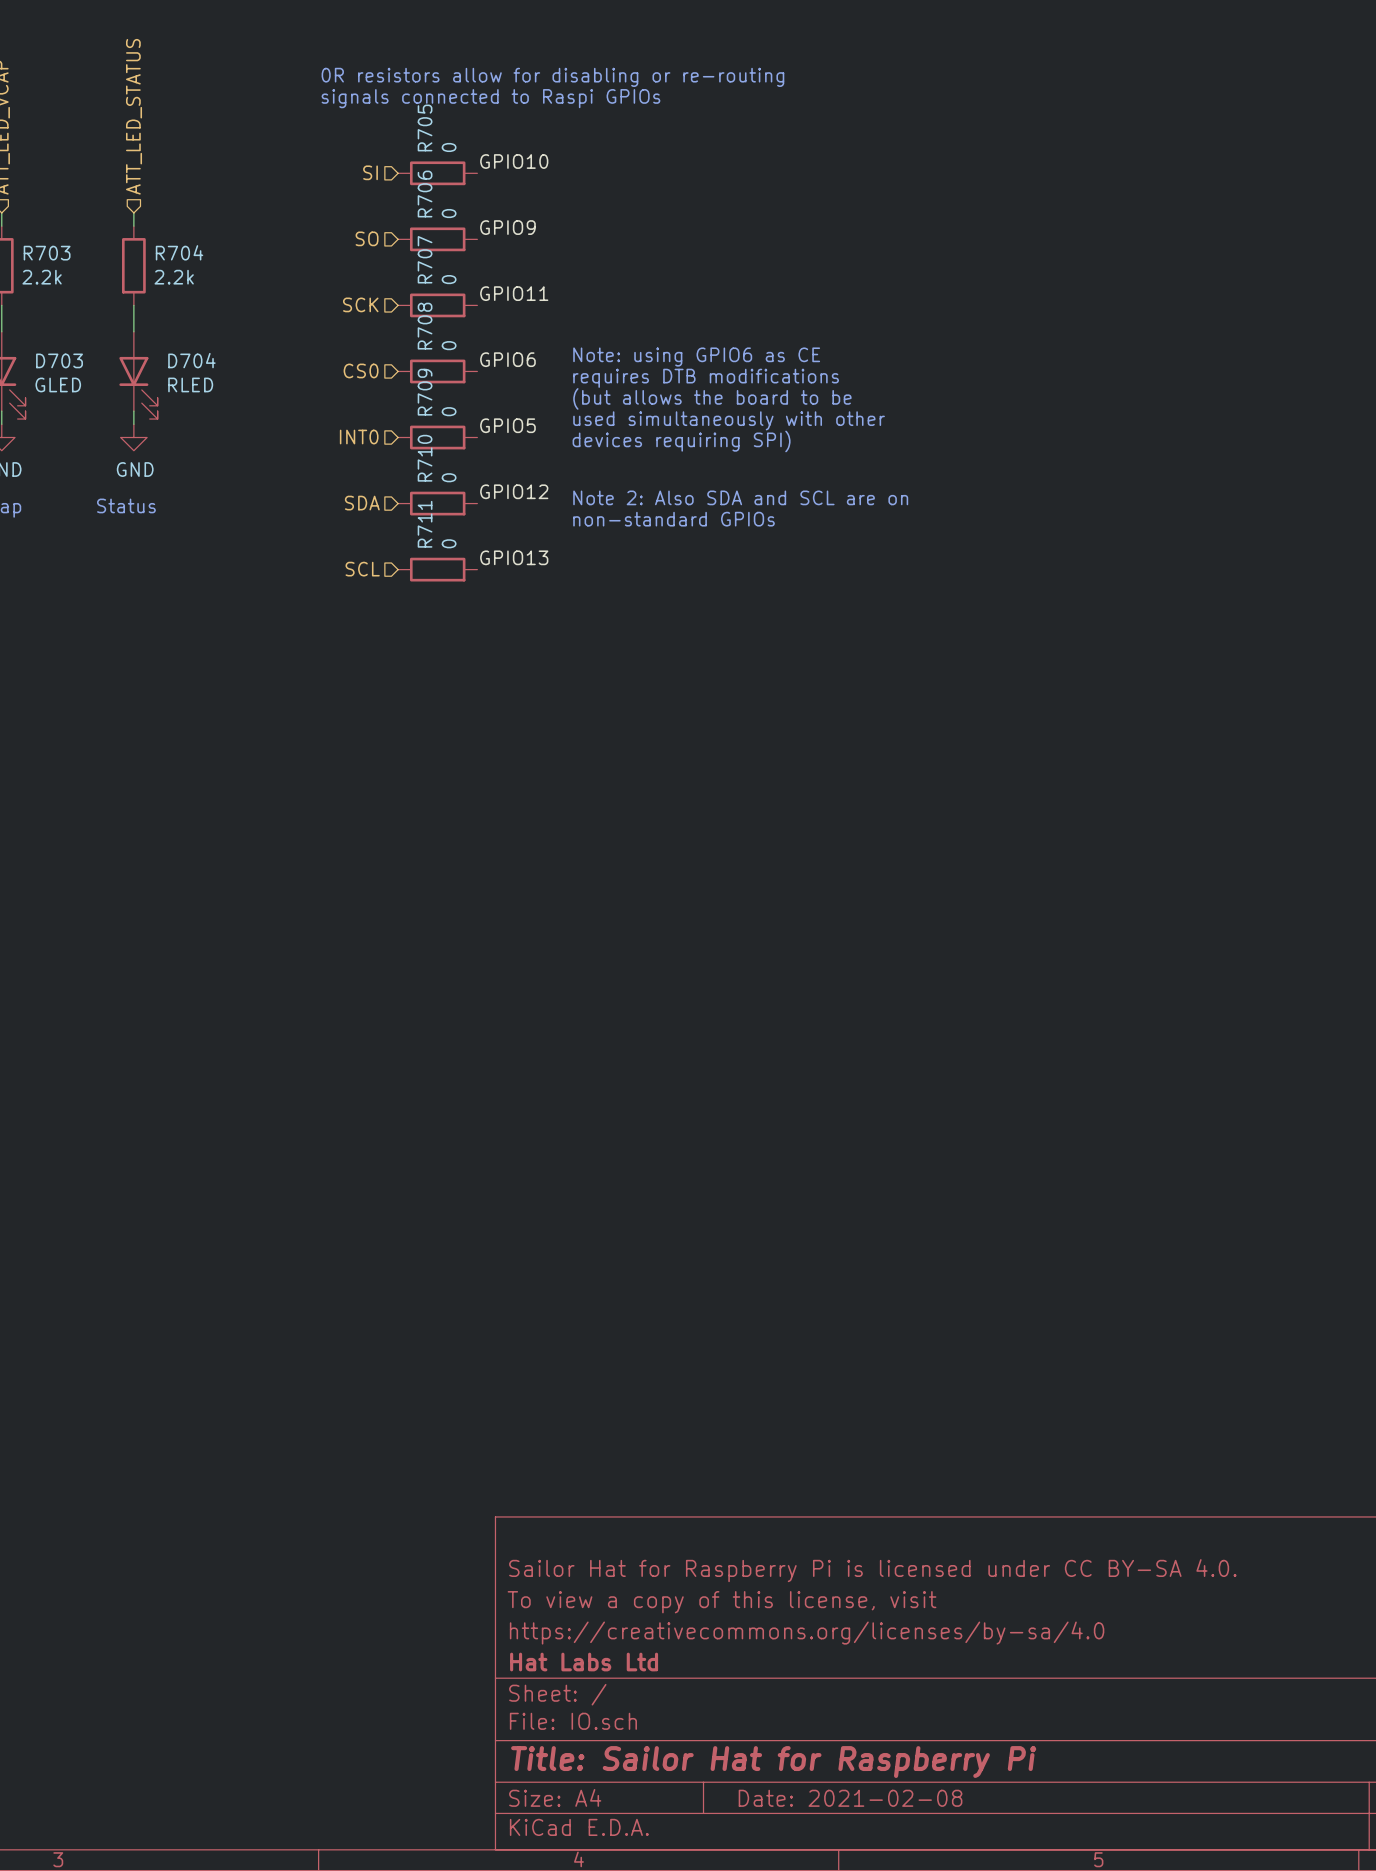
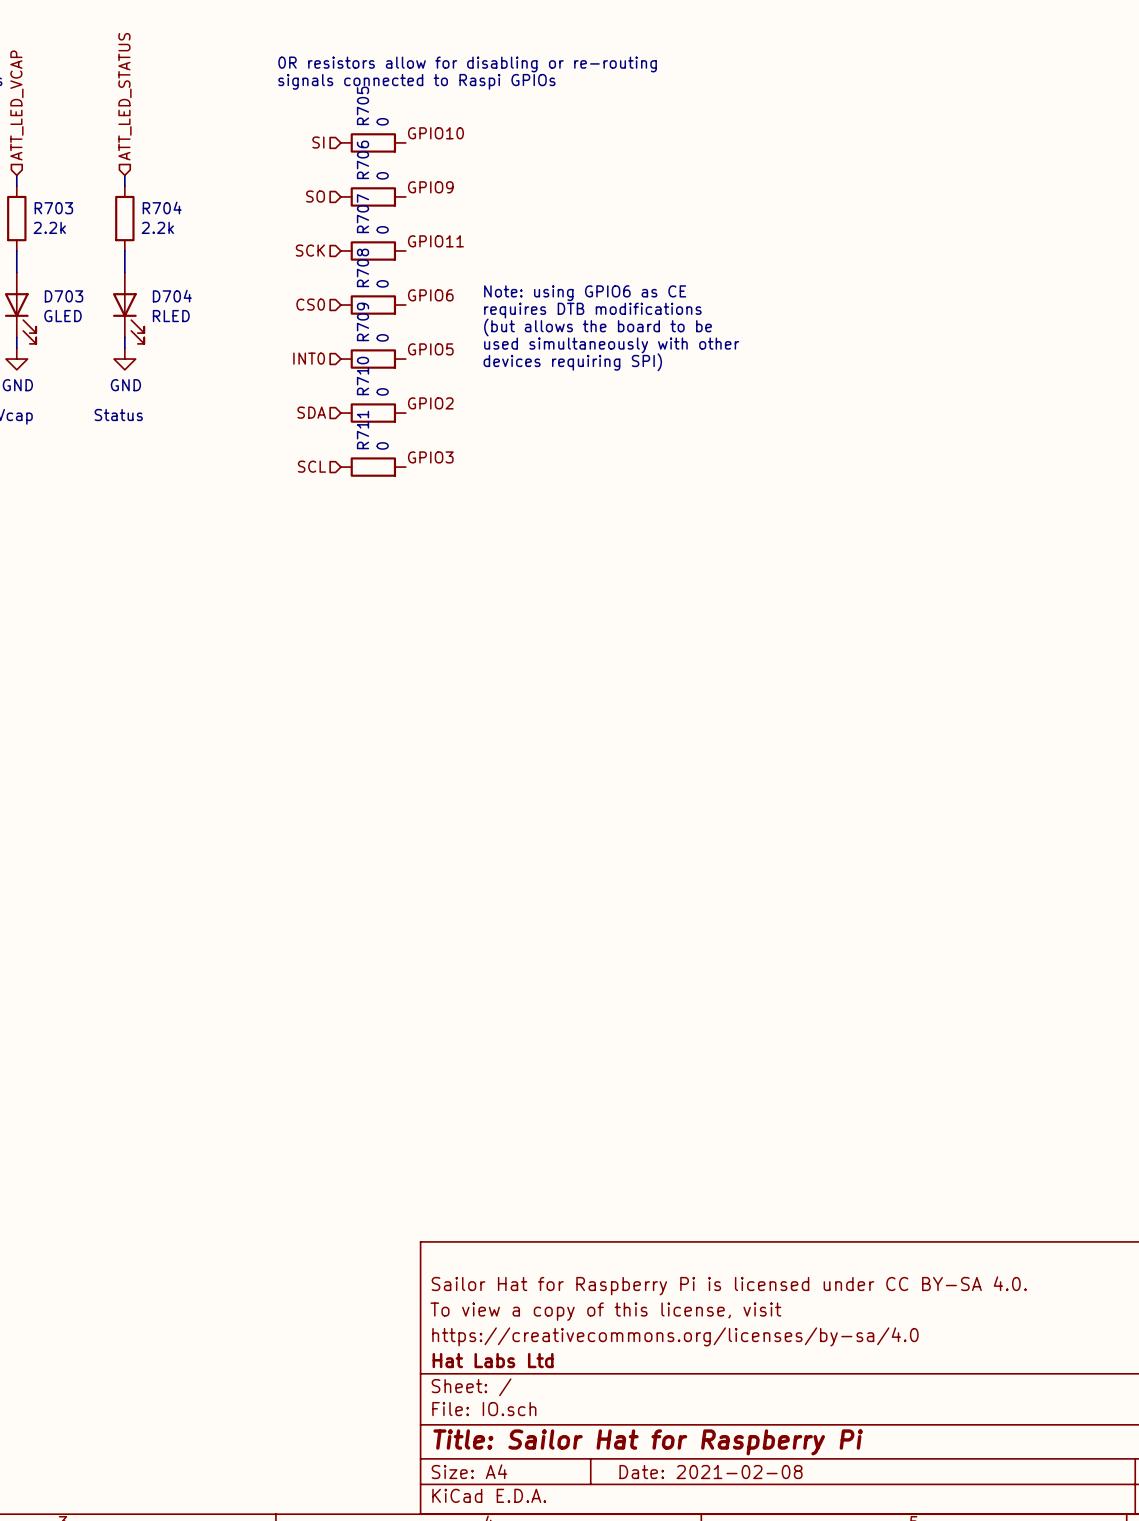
label: GPIO12 (514, 491) -> GPIO2 (430, 403)
text: Note 2: Also SDA and SCL are on (740, 497) -> none
text: non-standard GPIOs (674, 519) -> none
label: GPIO13 (514, 557) -> GPIO3 (430, 457)

